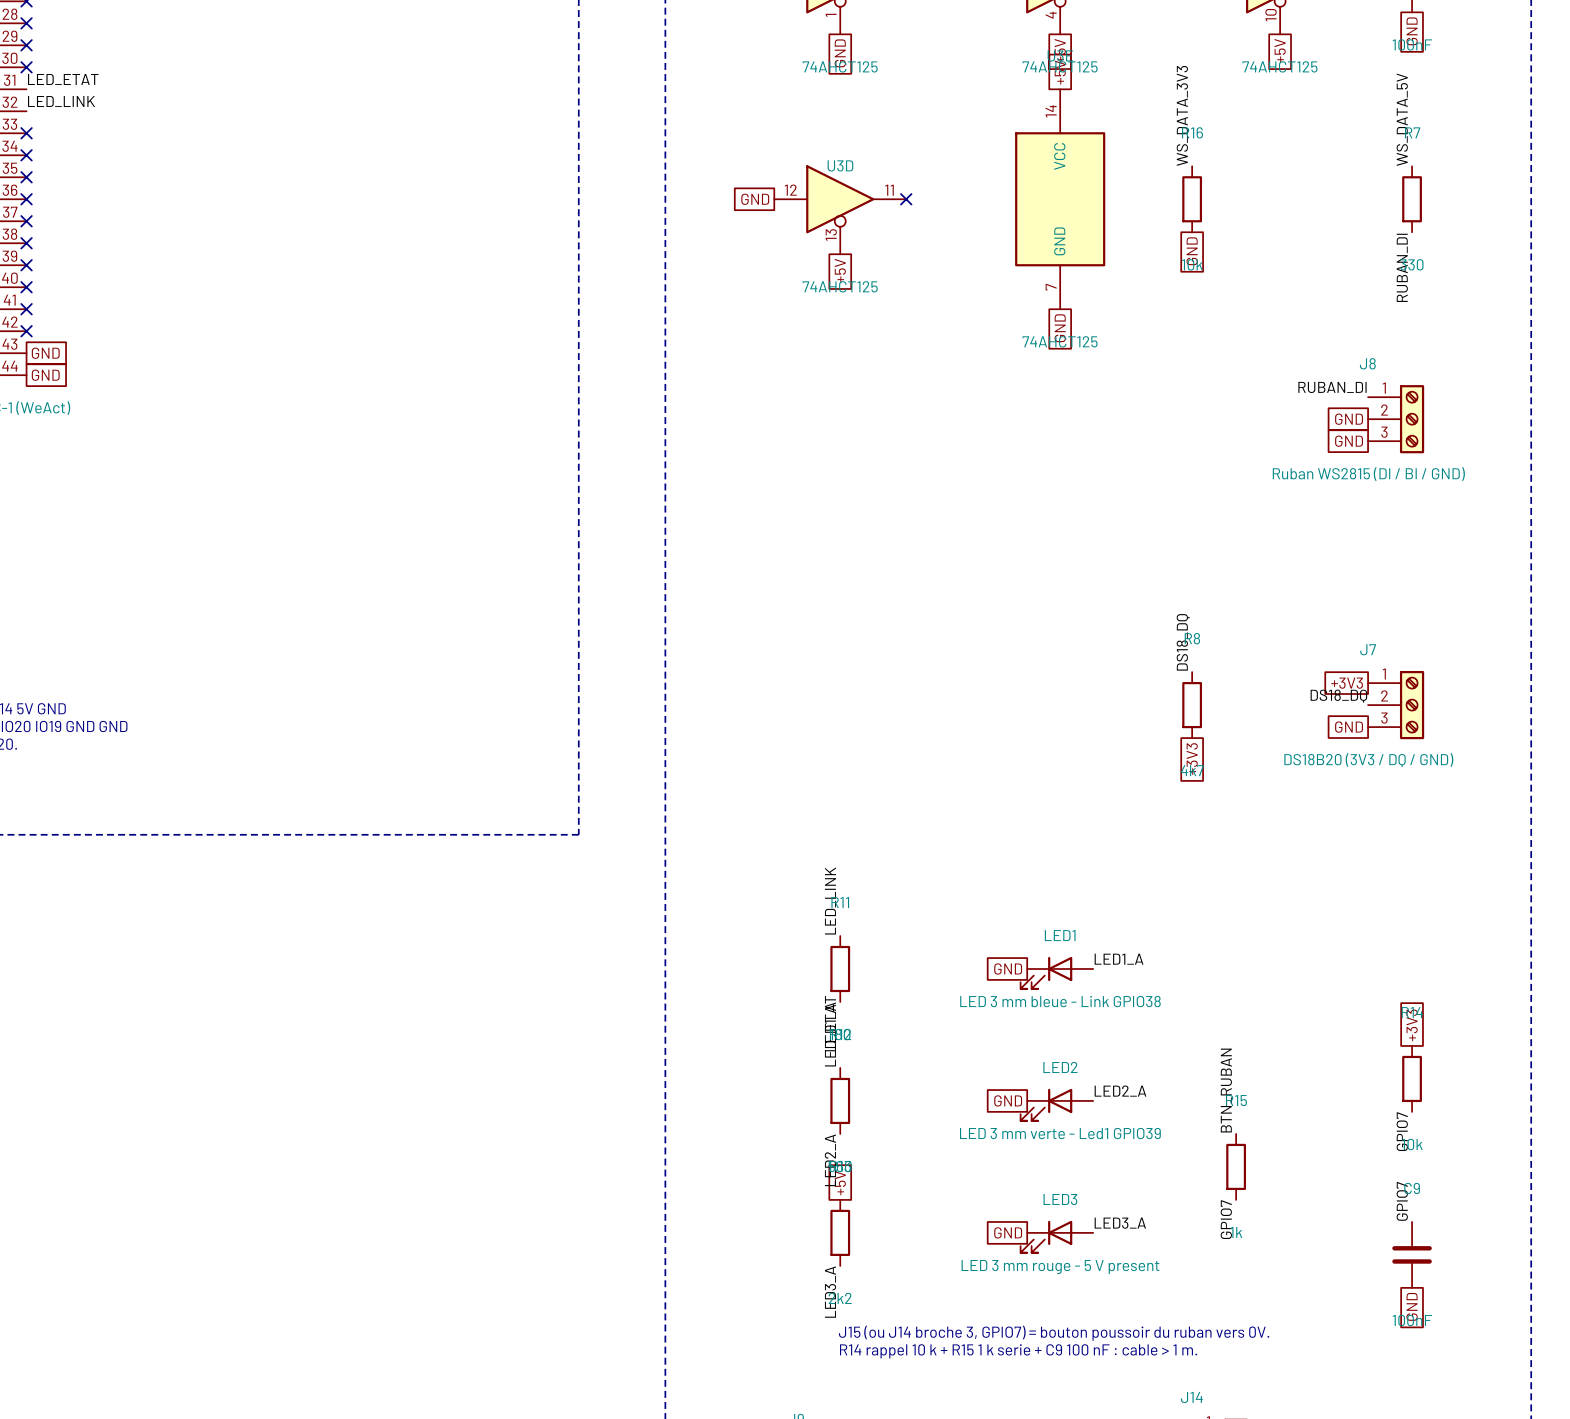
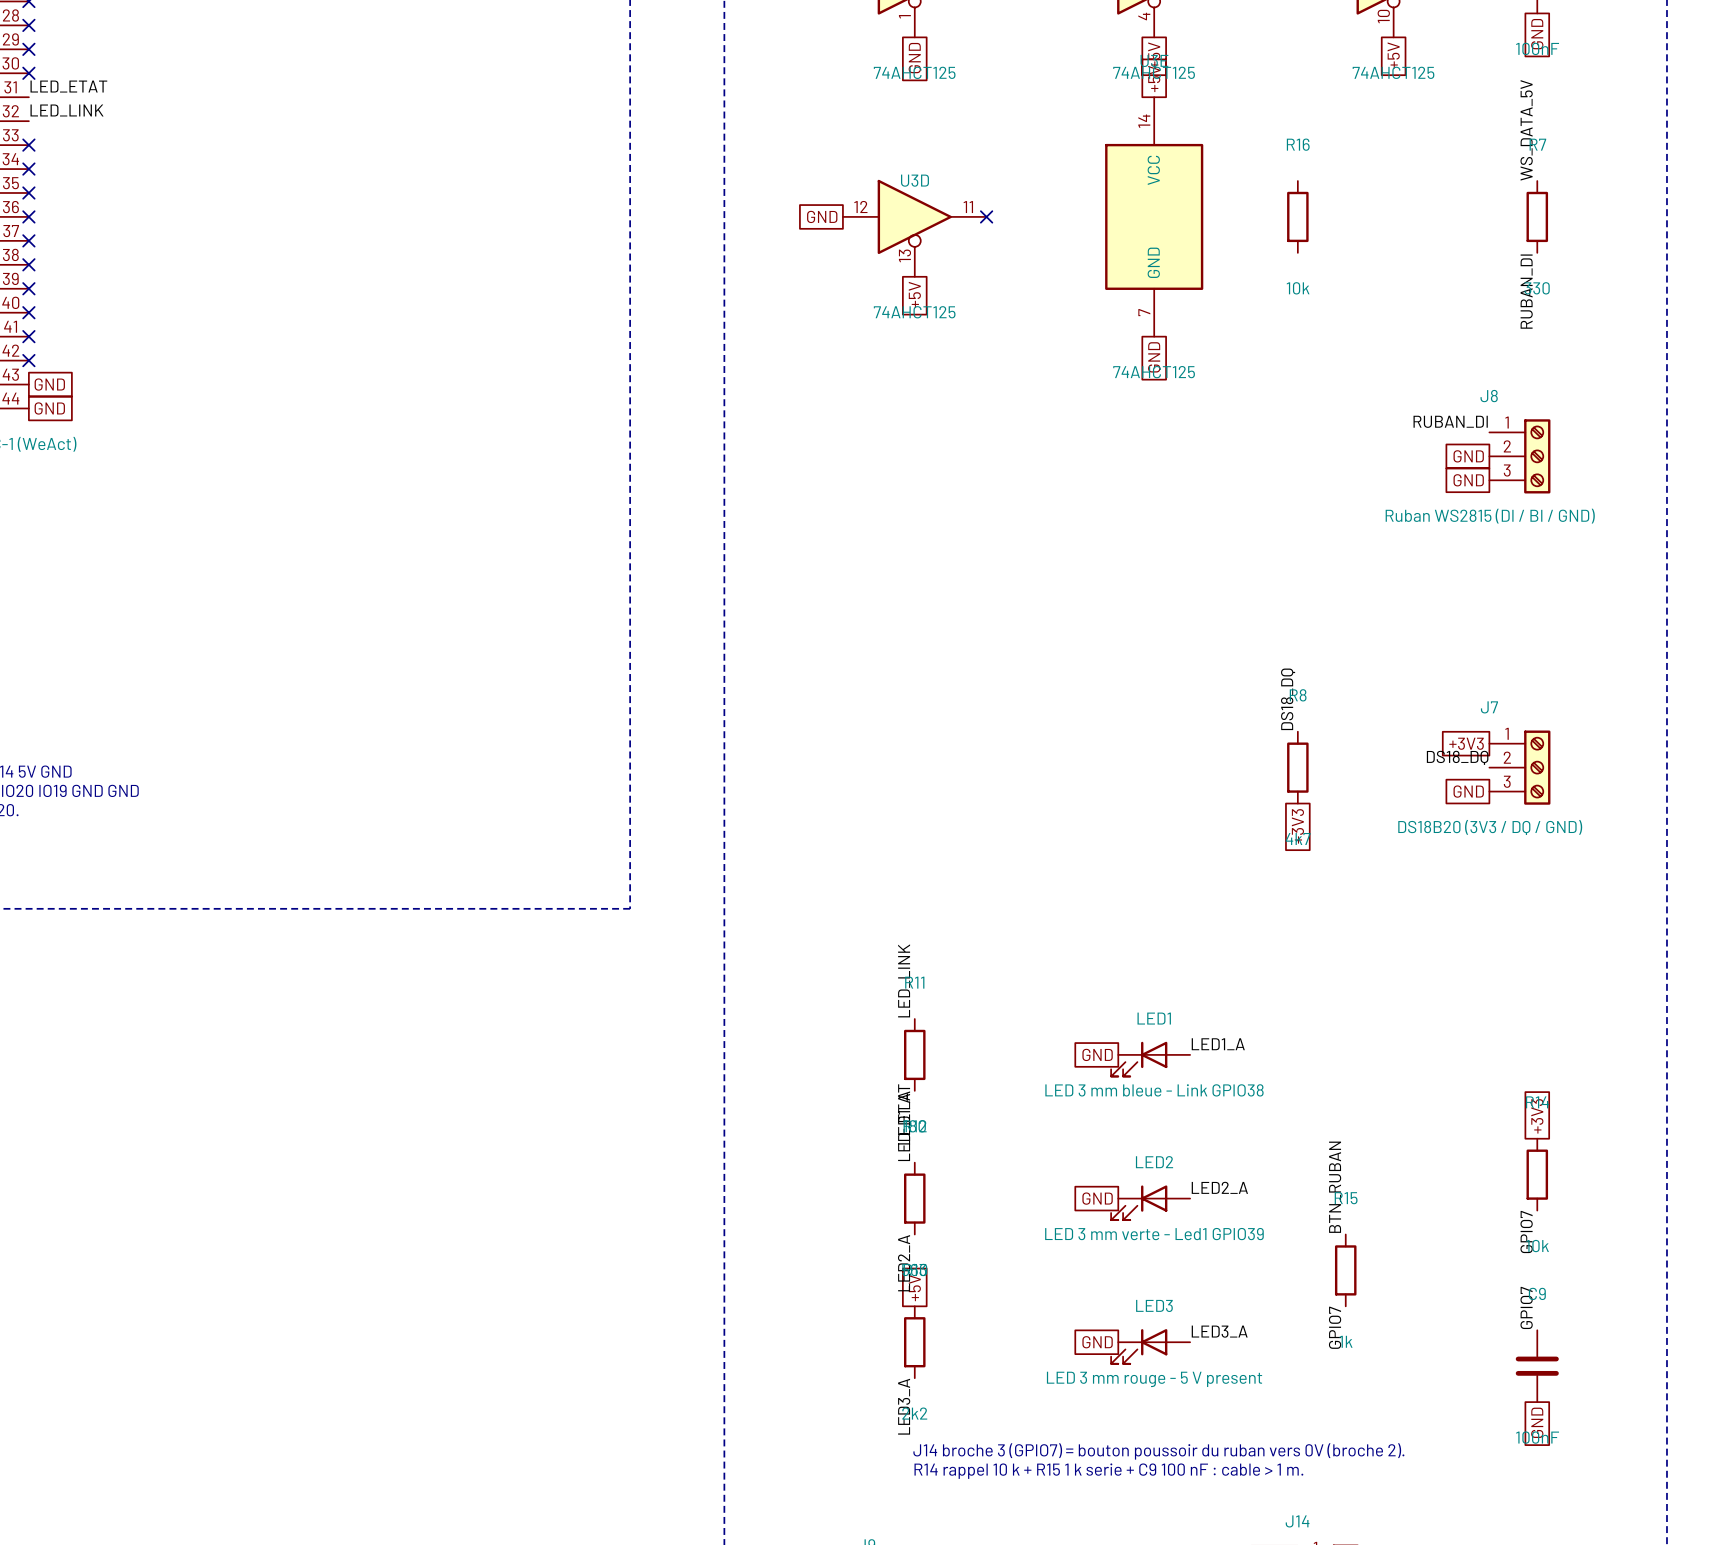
label: WS_DATA_3V3 (1182, 115) -> none
global label: GND (1192, 251) -> none
text: J15 (ou J14 broche 3, GPIO7) = bouton poussoir du ruban vers 0V. (1054, 1333) -> J14 broche 3 (GPIO7) = bouton poussoir du ruban vers 0V (broche 2). (1158, 1451)

